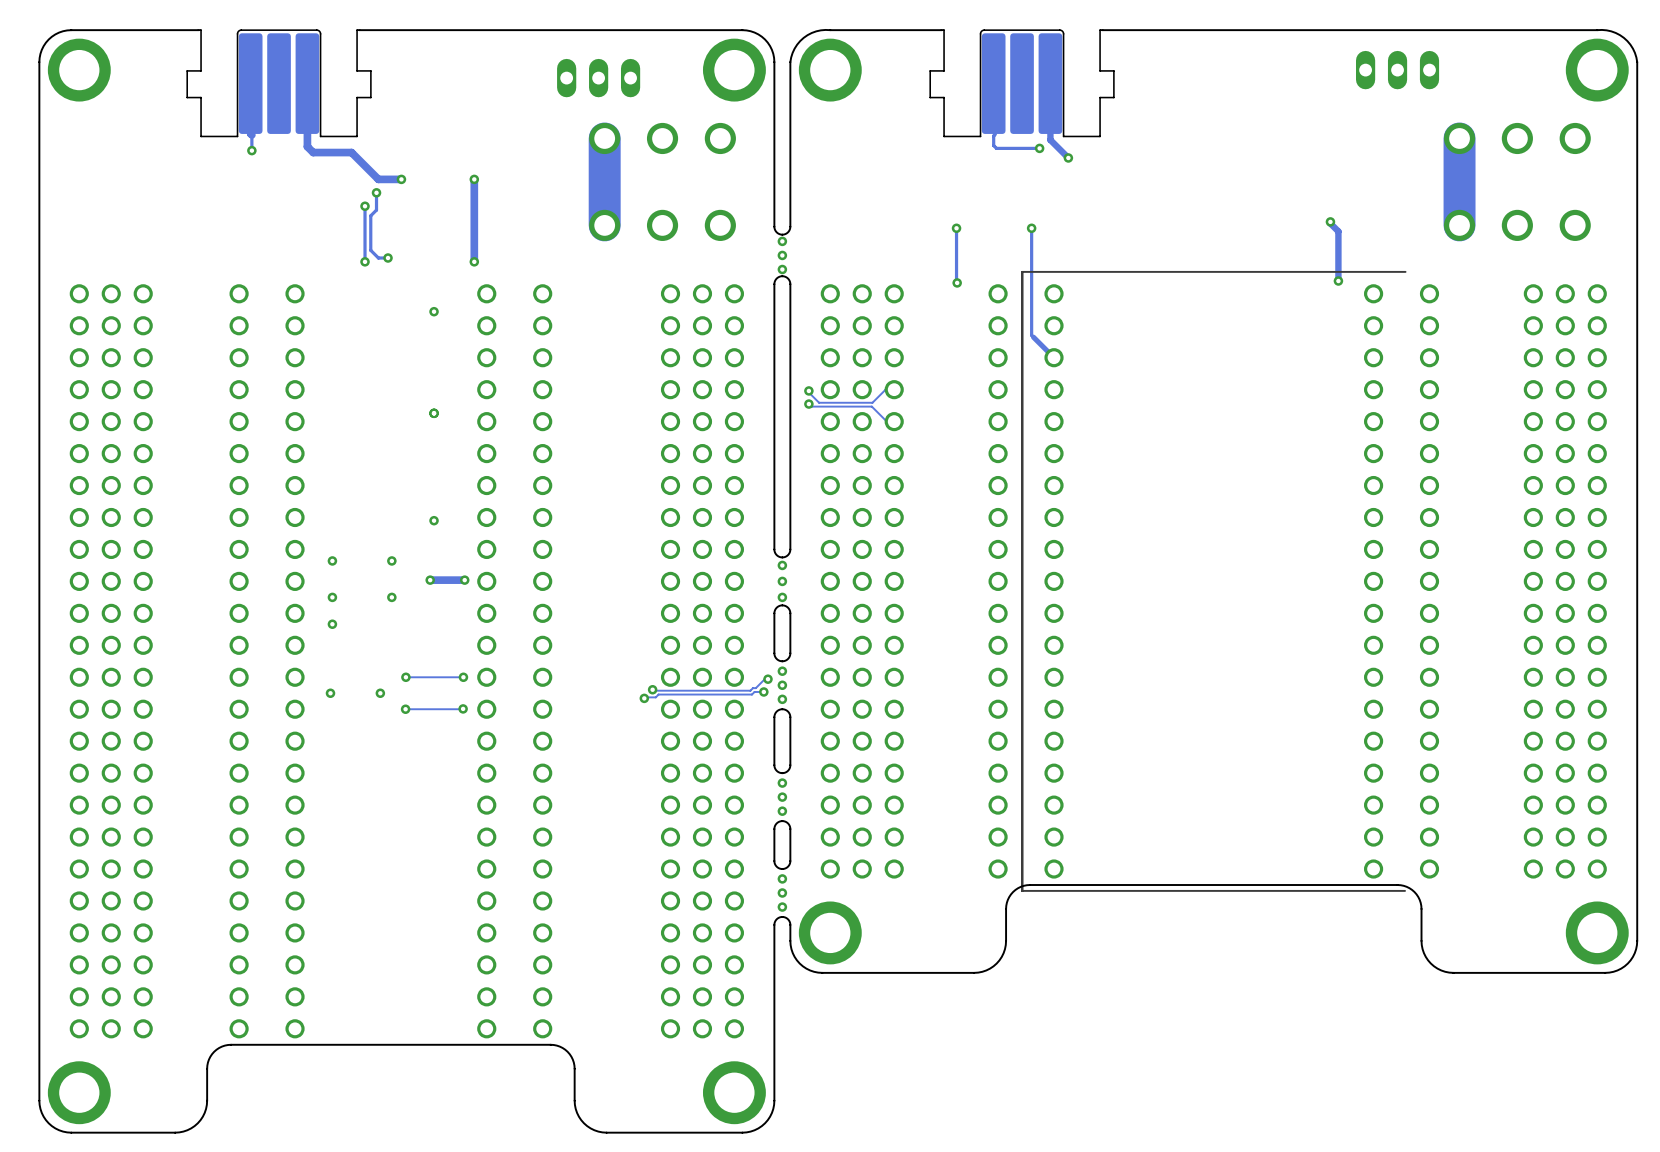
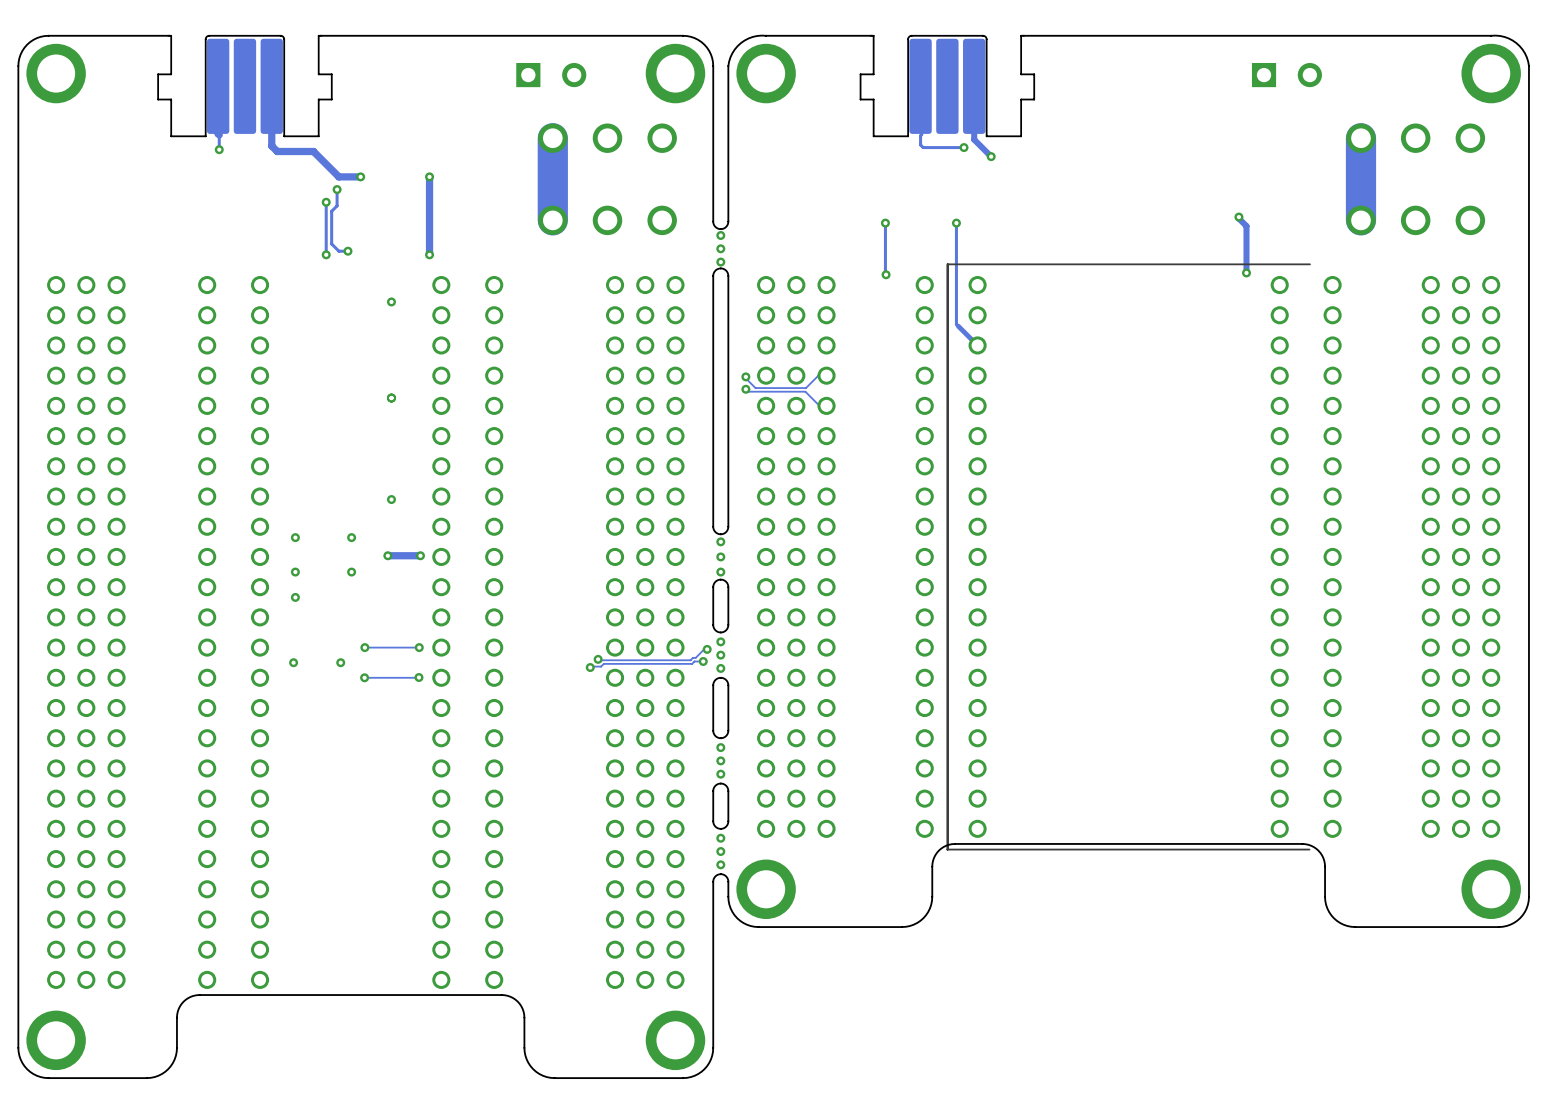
part footprint: [557, 58, 641, 98] -> [516, 62, 587, 88]
part: (1397, 70) -> none
part: none -> (1286, 75)

